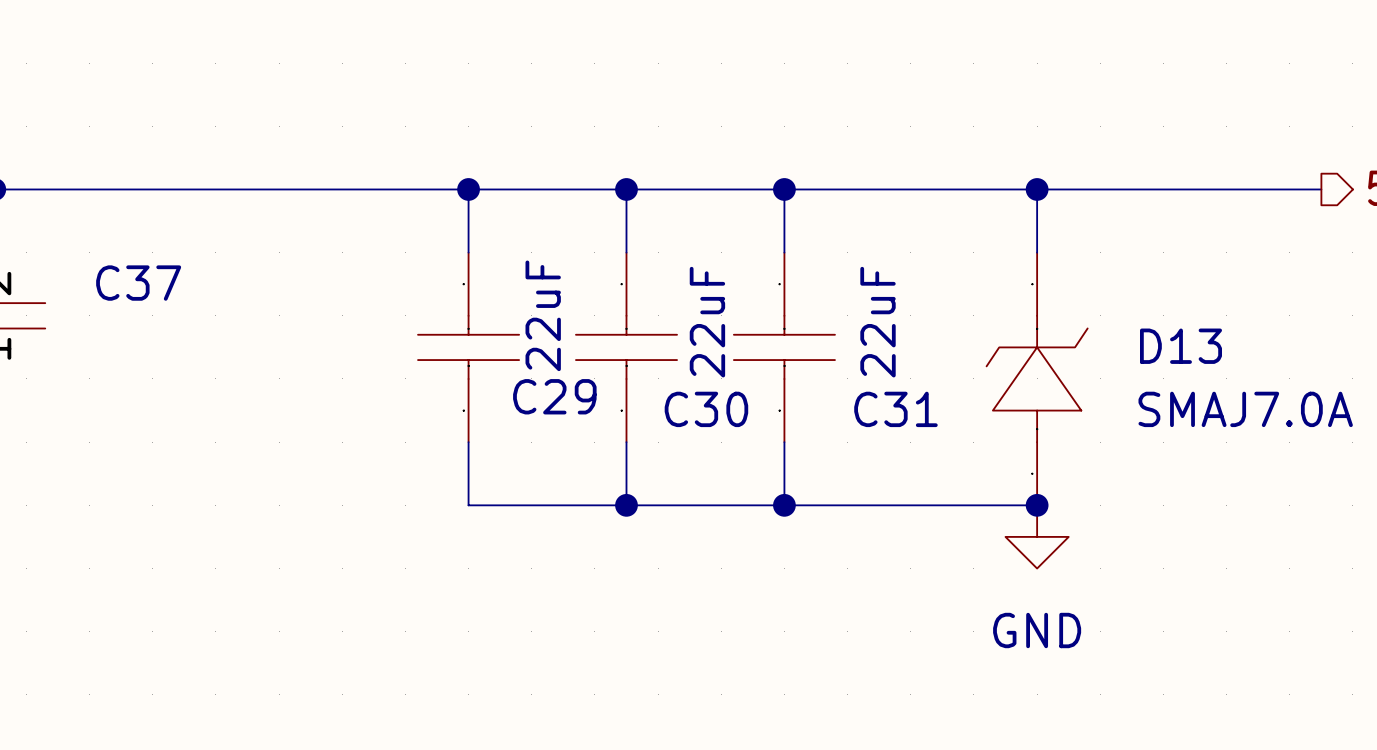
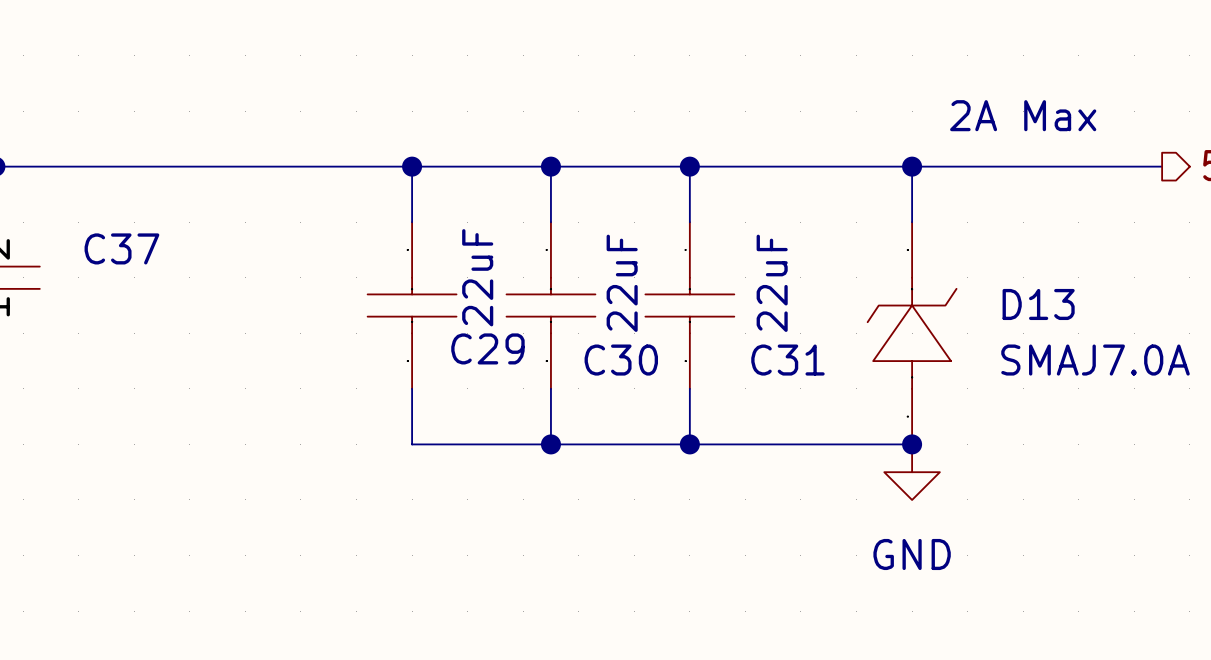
text: none -> 2A Max (1023, 115)

